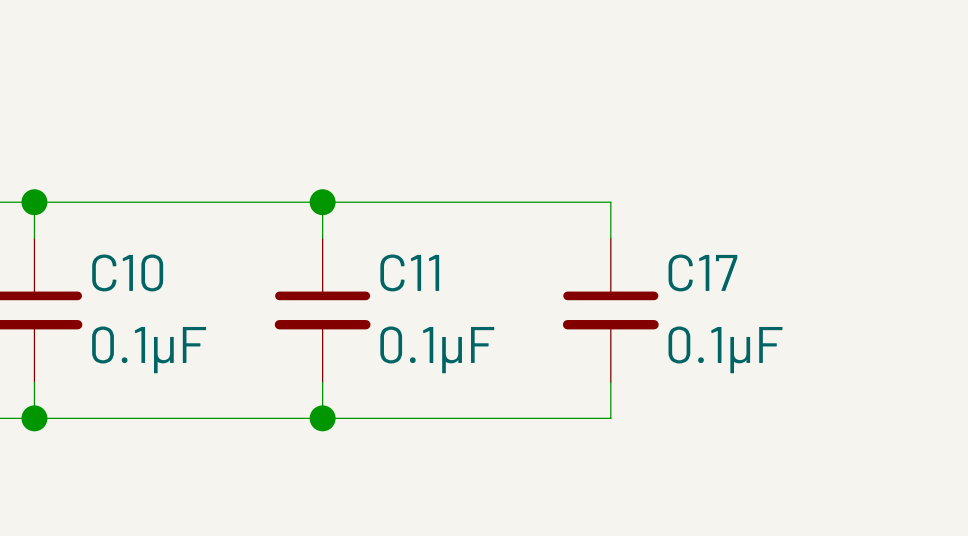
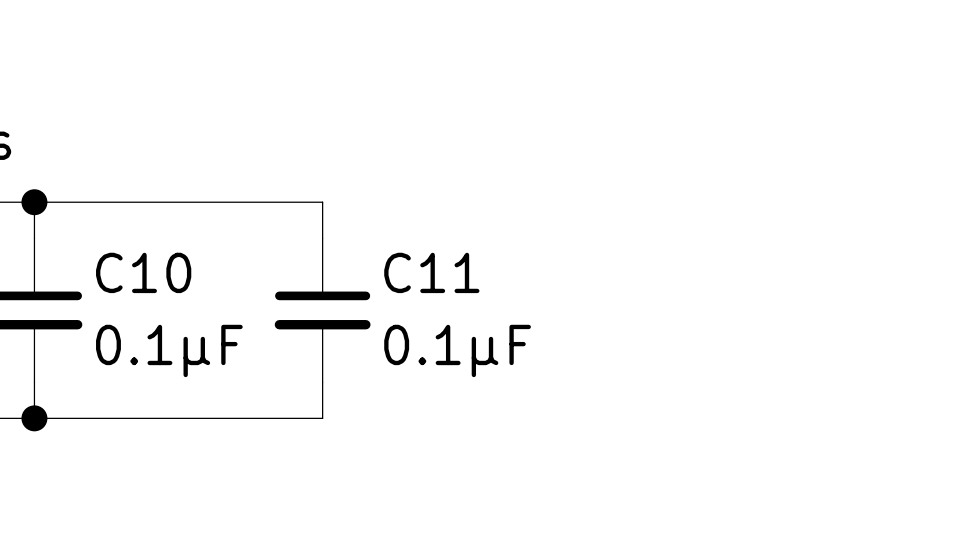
wire: (322, 202) (610, 202) (610, 238) -> none
junction: (322, 202) -> none
C17: 0.1µF (610, 310) -> none
wire: (610, 382) (610, 418) (322, 418) -> none
junction: (322, 418) -> none

